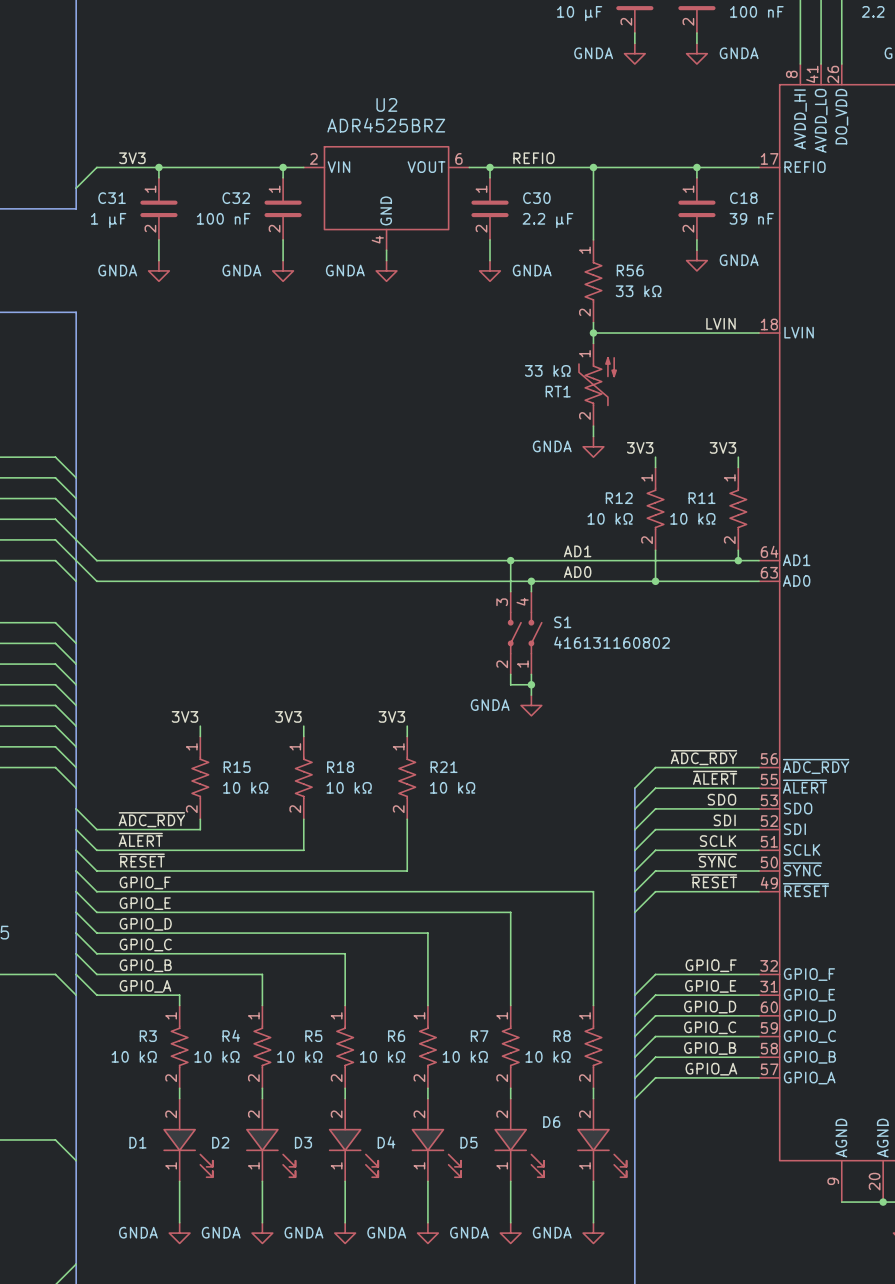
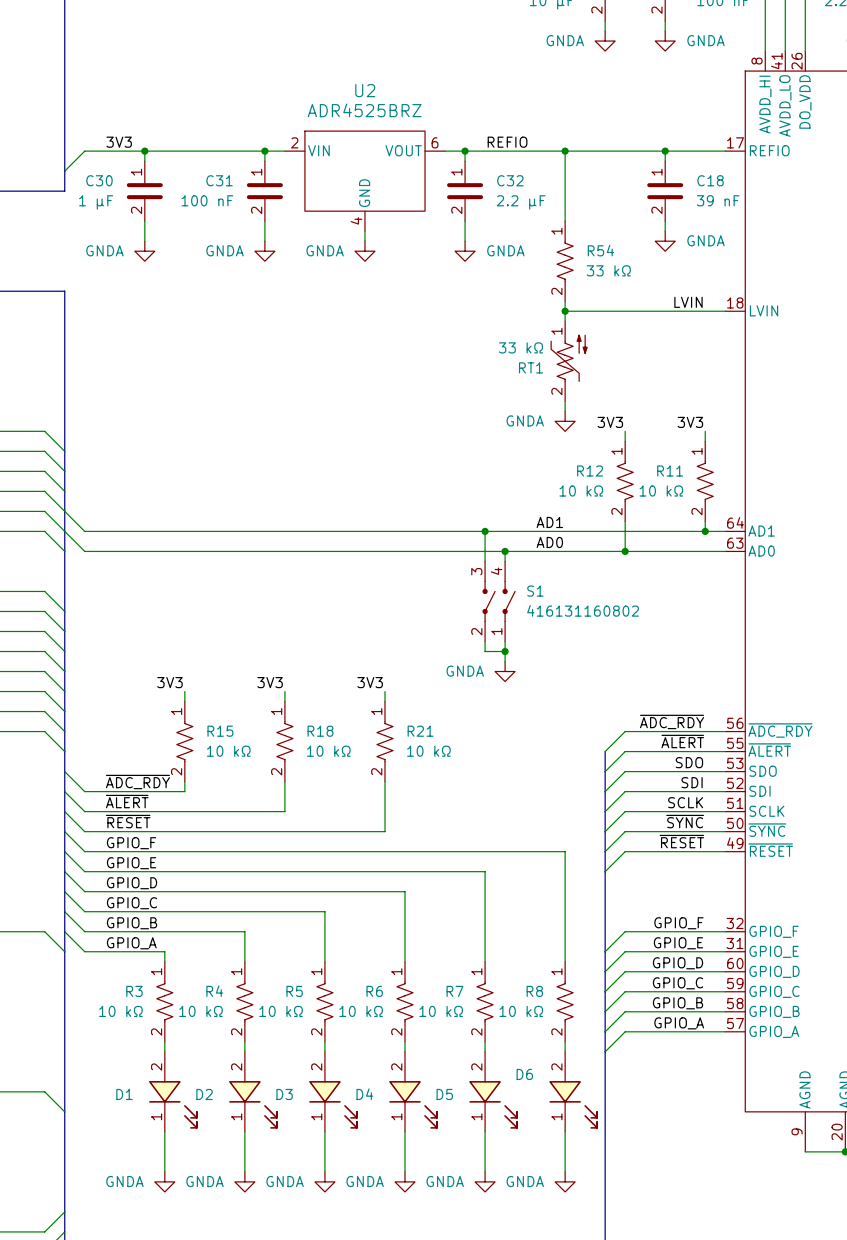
C31 name: C31 (112, 198) -> C30 (99, 180)
C32 name: C32 (236, 198) -> C31 (219, 180)
C30 name: C30 (536, 198) -> C32 (510, 180)
R56 name: R56 (630, 270) -> R54 (600, 250)

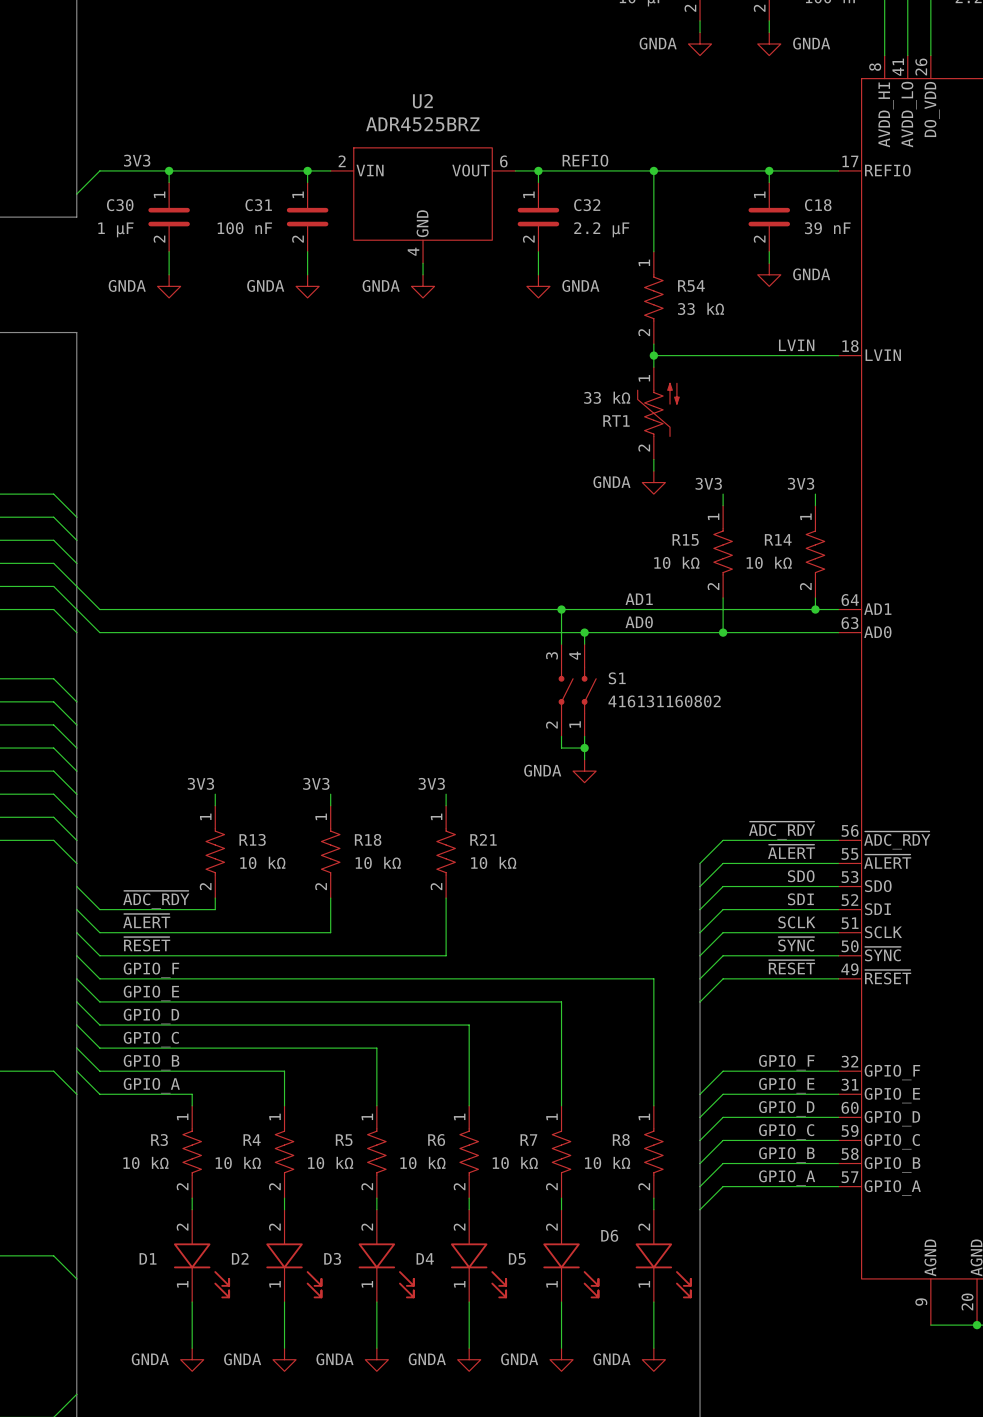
R12 name: R12 (590, 470) -> R15 (685, 539)
R11 name: R11 (670, 470) -> R14 (778, 539)
R15 name: R15 (220, 731) -> R13 (252, 839)

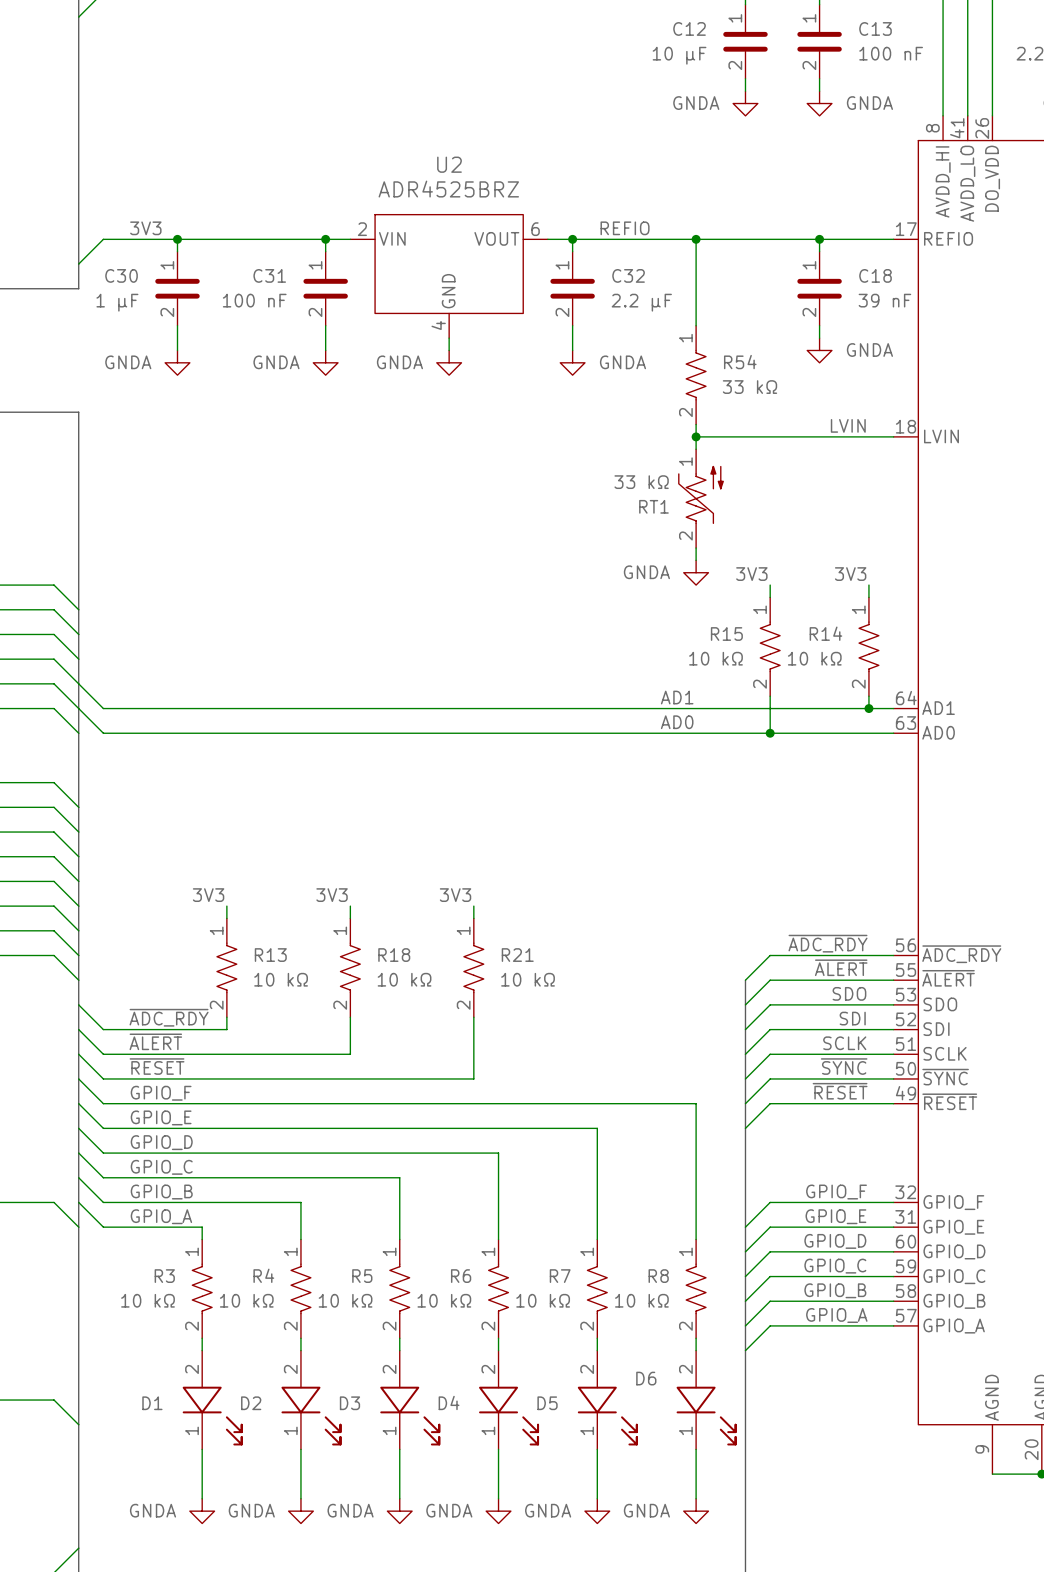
wire: (561, 609) (561, 644) -> none
junction: (561, 609) -> none
wire: (584, 632) (584, 644) -> none
junction: (584, 632) -> none
S1: 416131160802 (577, 690) -> none
wire: (561, 736) (561, 748) (584, 748) -> none
wire: (584, 736) (584, 759) -> none
junction: (584, 748) -> none
power symbol: GNDA (584, 771) -> none

